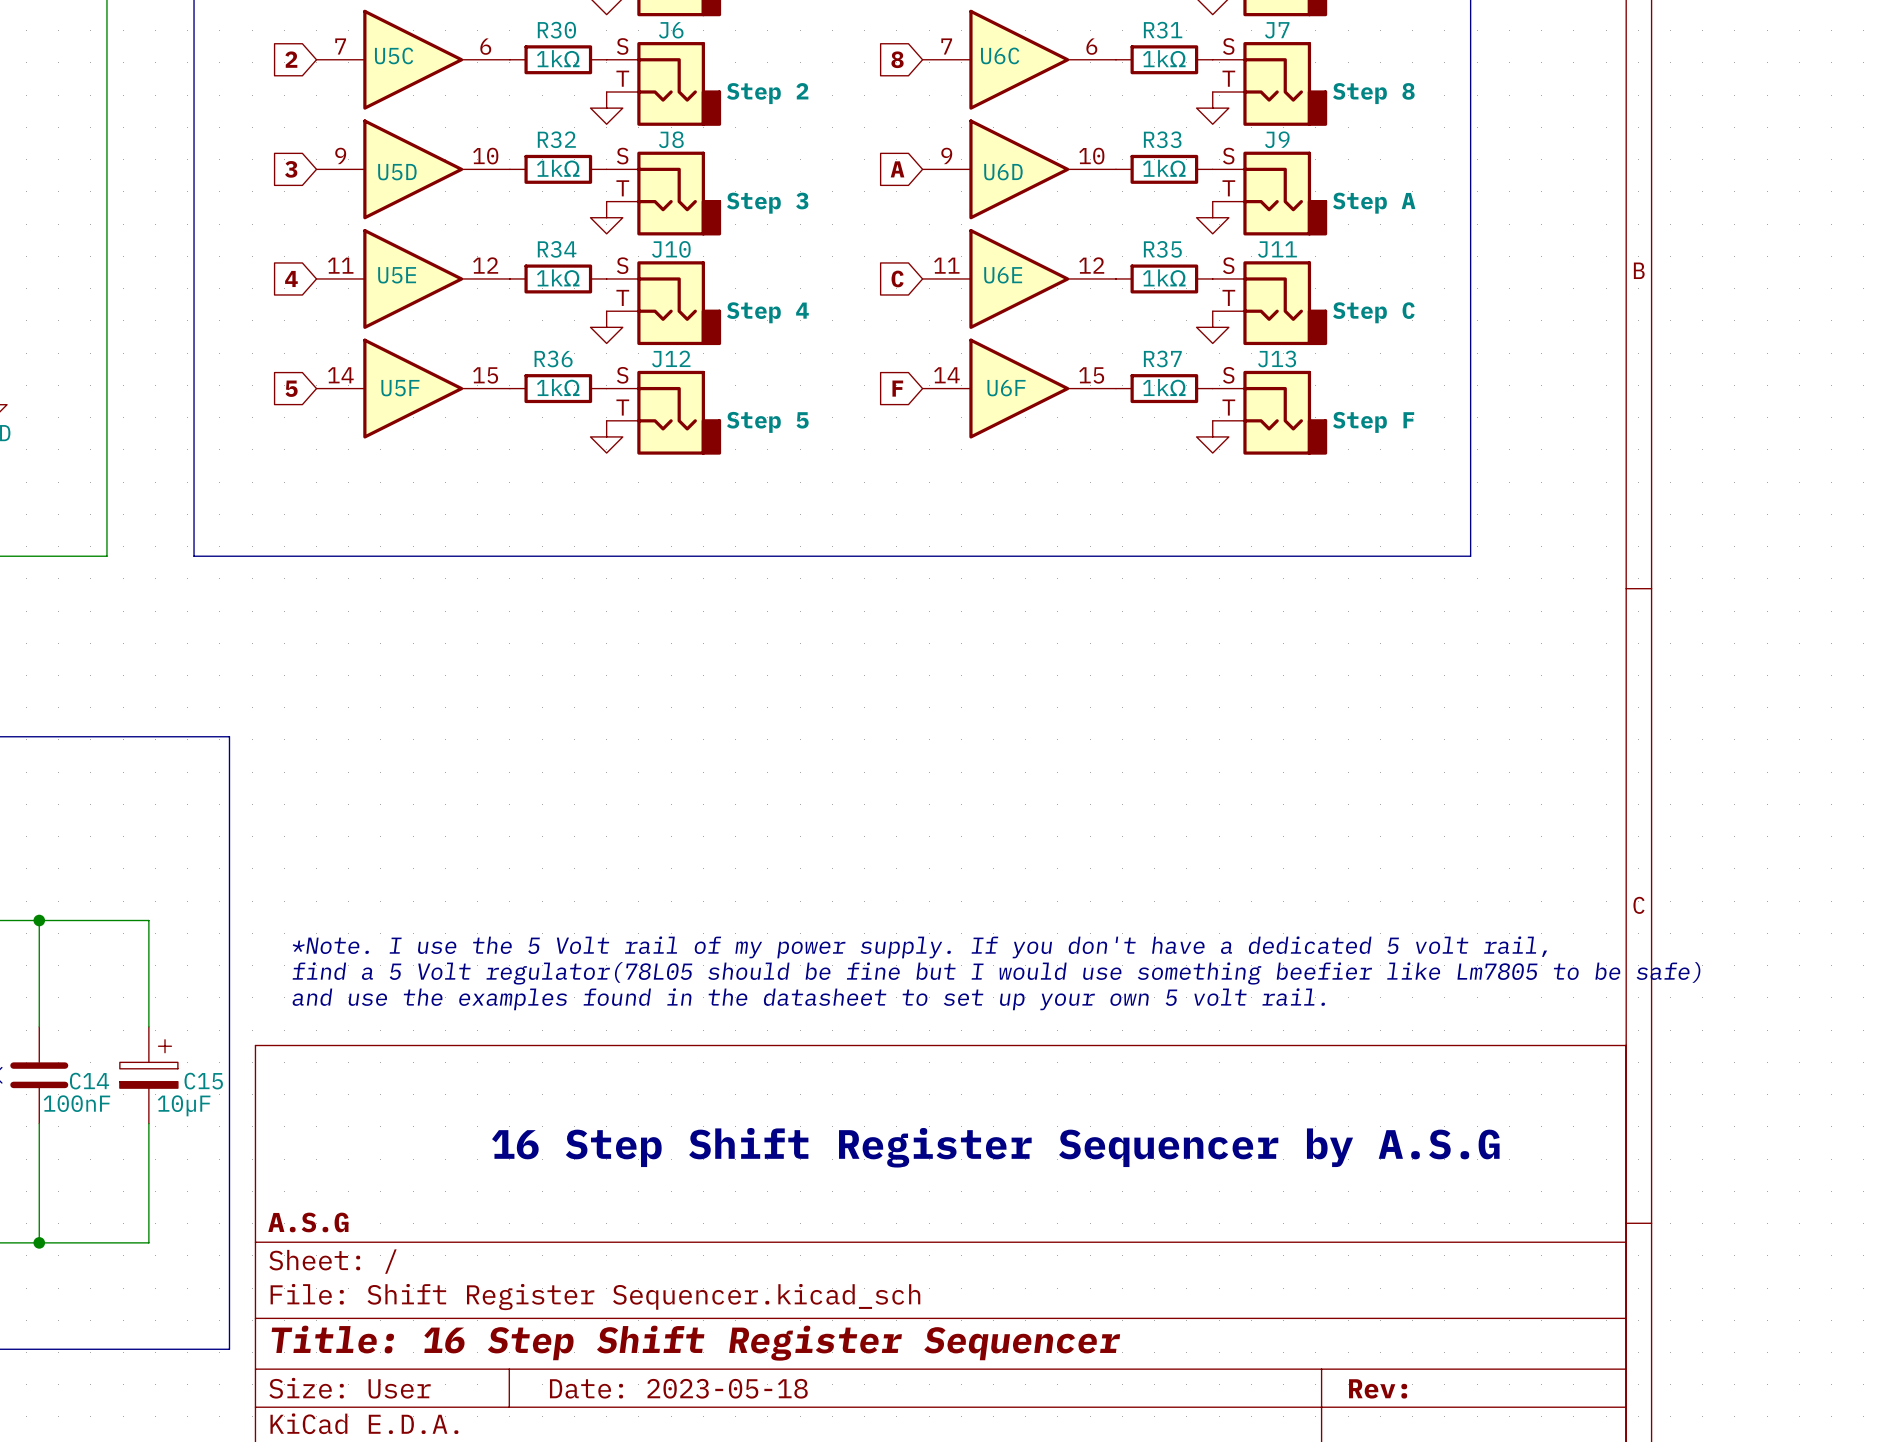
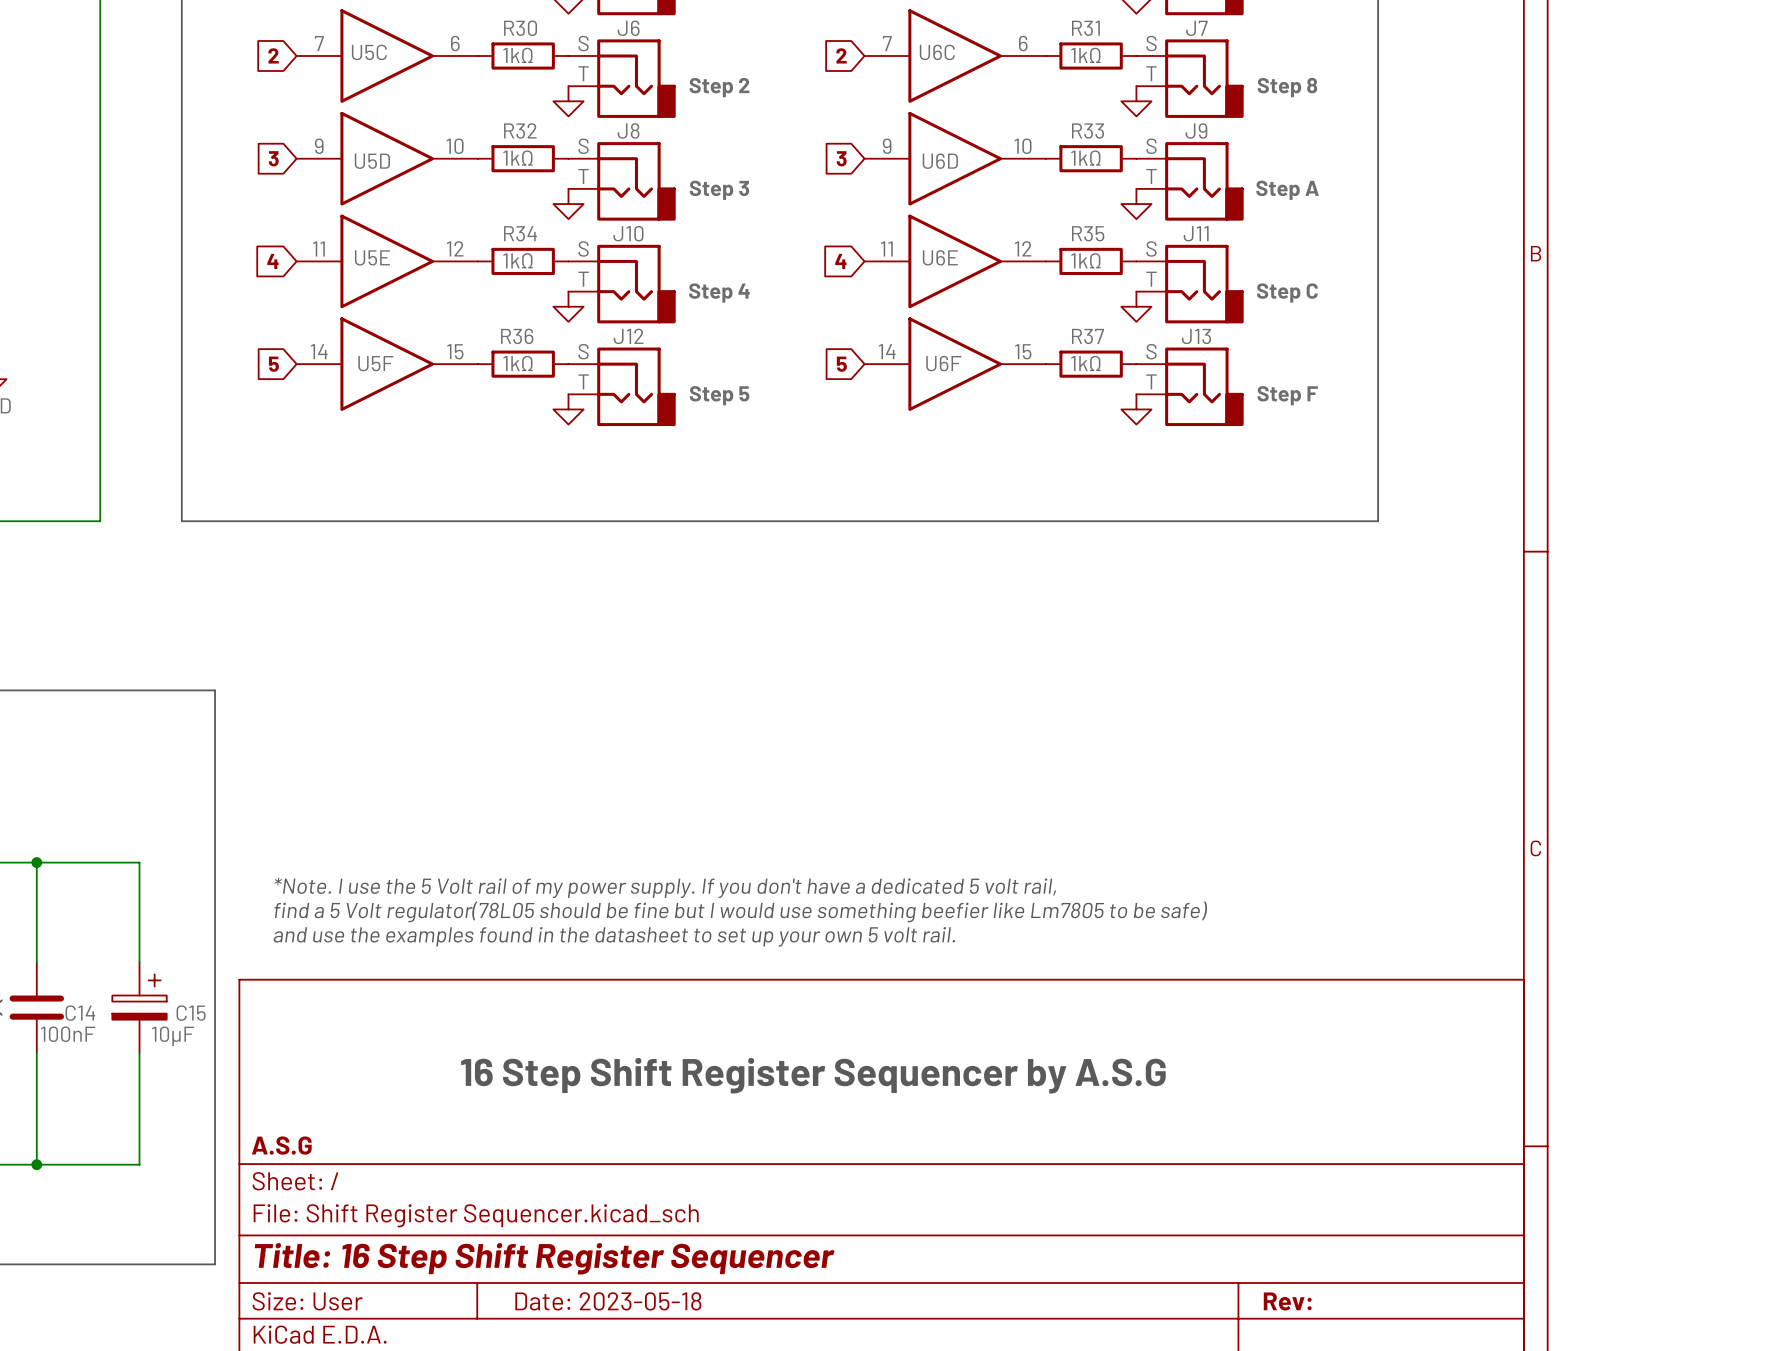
global label: 8 (897, 59) -> 2 (841, 55)
global label: A (897, 169) -> 3 (841, 158)
global label: C (897, 278) -> 4 (840, 261)
global label: F (897, 388) -> 5 (841, 364)

